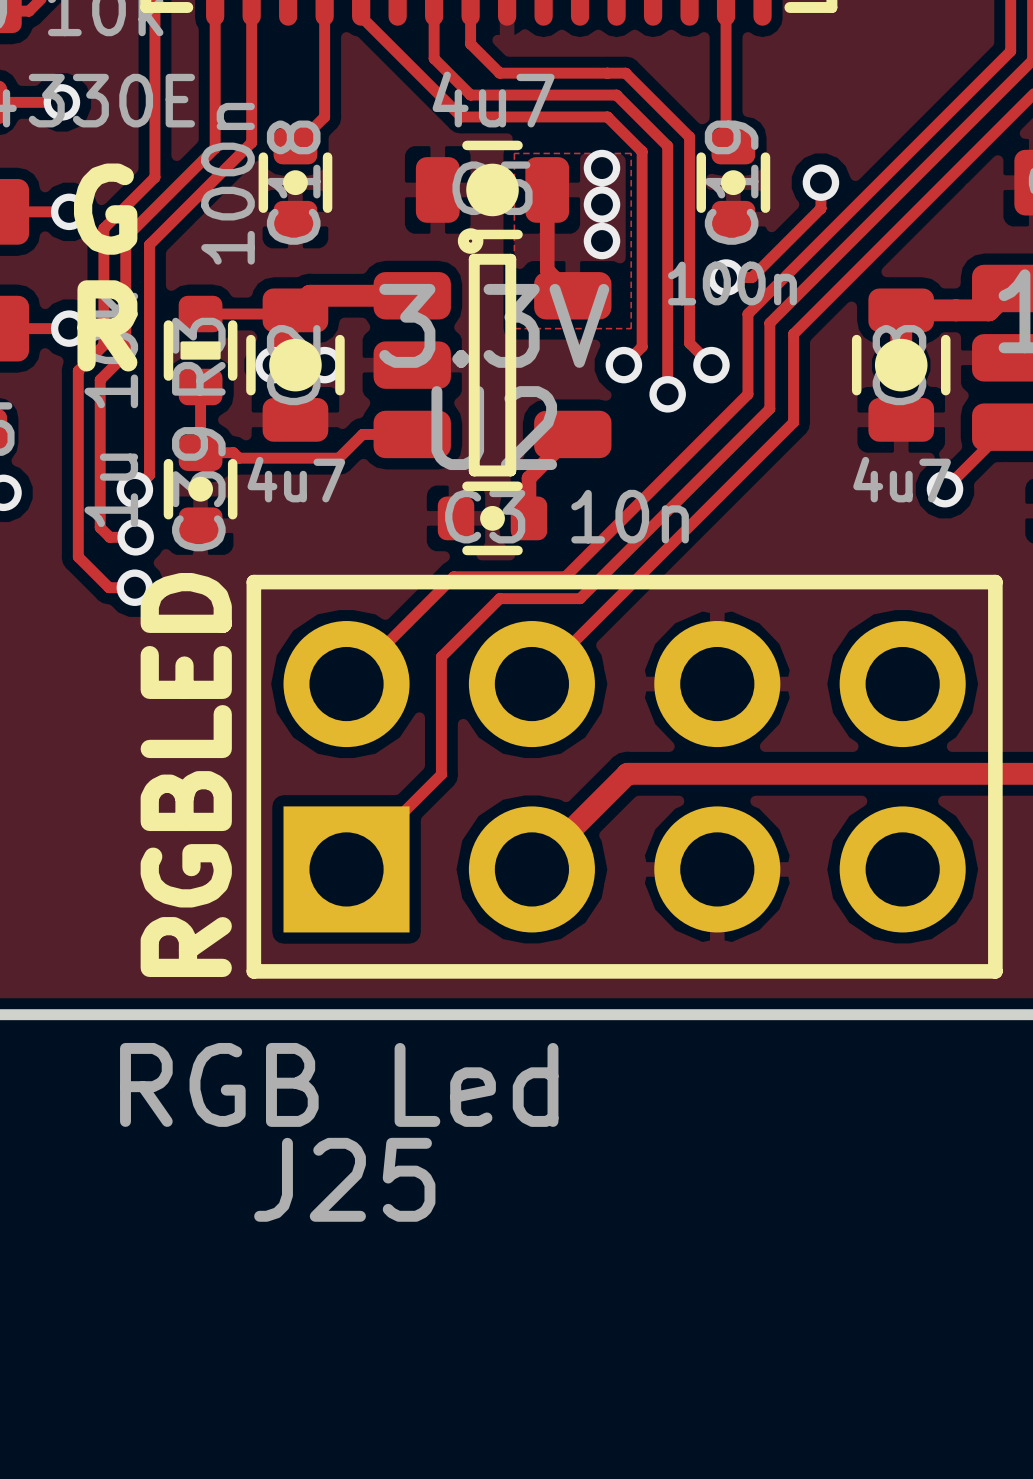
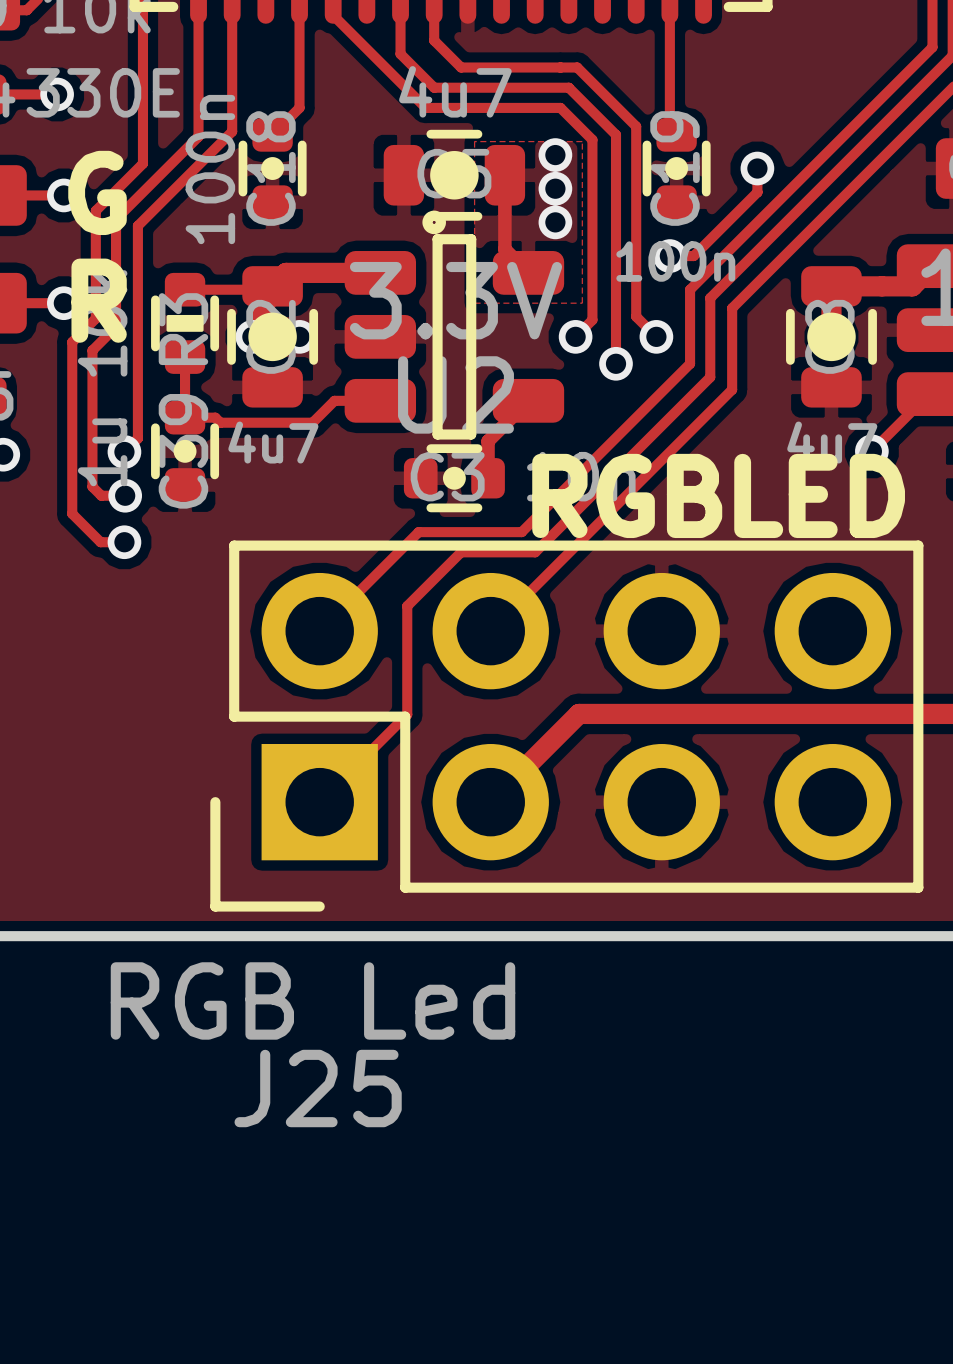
line: (253, 582) (995, 582) (995, 971) (253, 971) (253, 582) -> none
J25 footprint: [283, 621, 966, 933] -> [210, 540, 924, 912]
text rotation: 0° (186, 775) -> 90° clockwise (718, 495)
text position: RGBLED (186, 775) -> RGBLED (718, 495)

